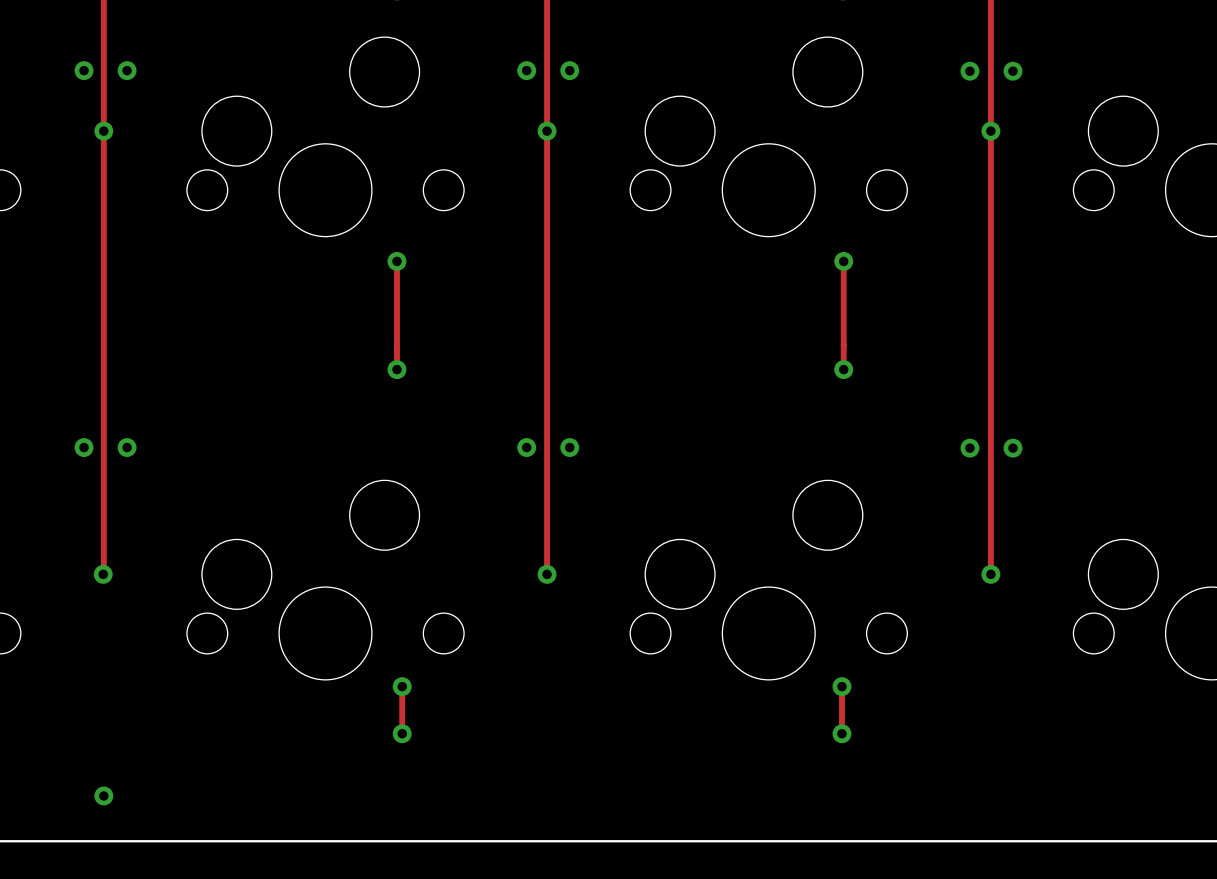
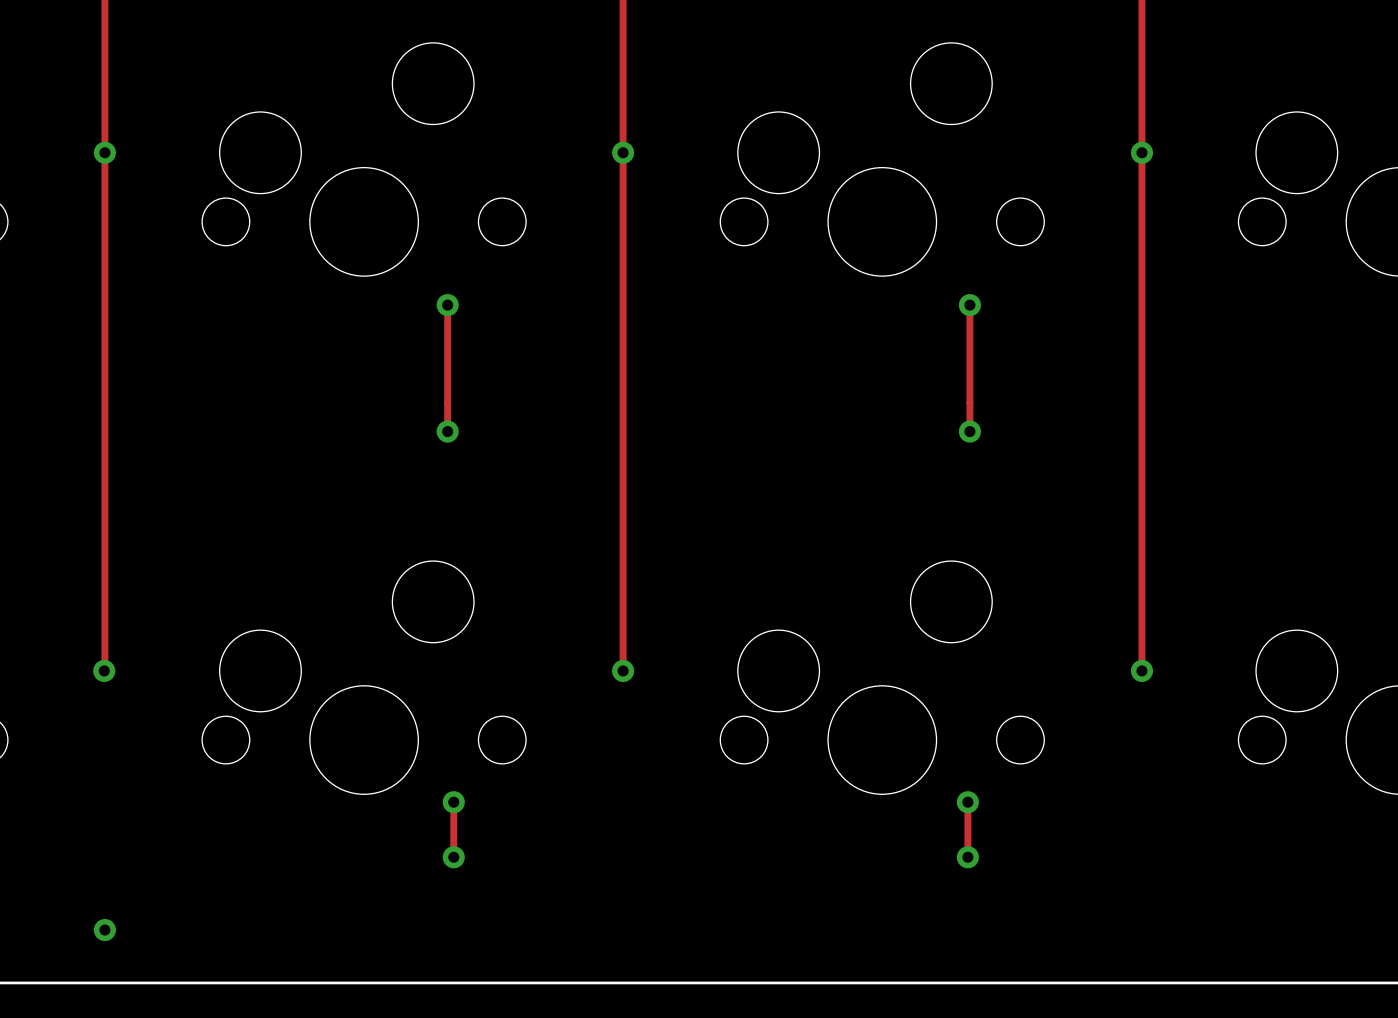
via: (84, 70) -> none
via: (127, 70) -> none
via: (526, 70) -> none
via: (569, 70) -> none
via: (969, 71) -> none
via: (1012, 71) -> none
via: (84, 447) -> none
via: (127, 447) -> none
via: (526, 447) -> none
via: (569, 447) -> none
via: (969, 448) -> none
via: (1012, 448) -> none

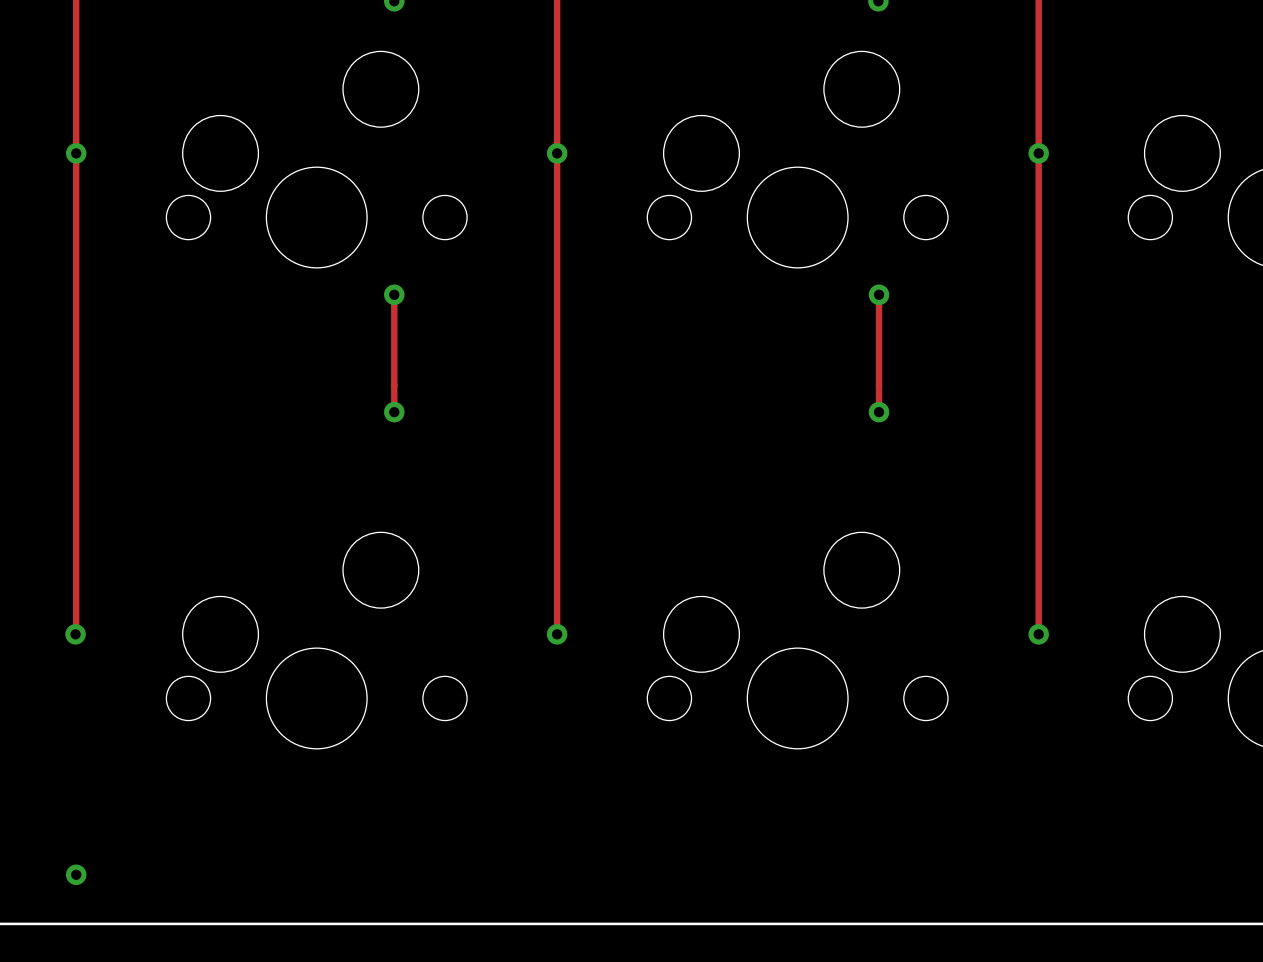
track: (453, 802) (453, 857) -> none
via: (453, 802) -> none
track: (967, 802) (967, 857) -> none
via: (967, 802) -> none
via: (453, 857) -> none
via: (967, 857) -> none

